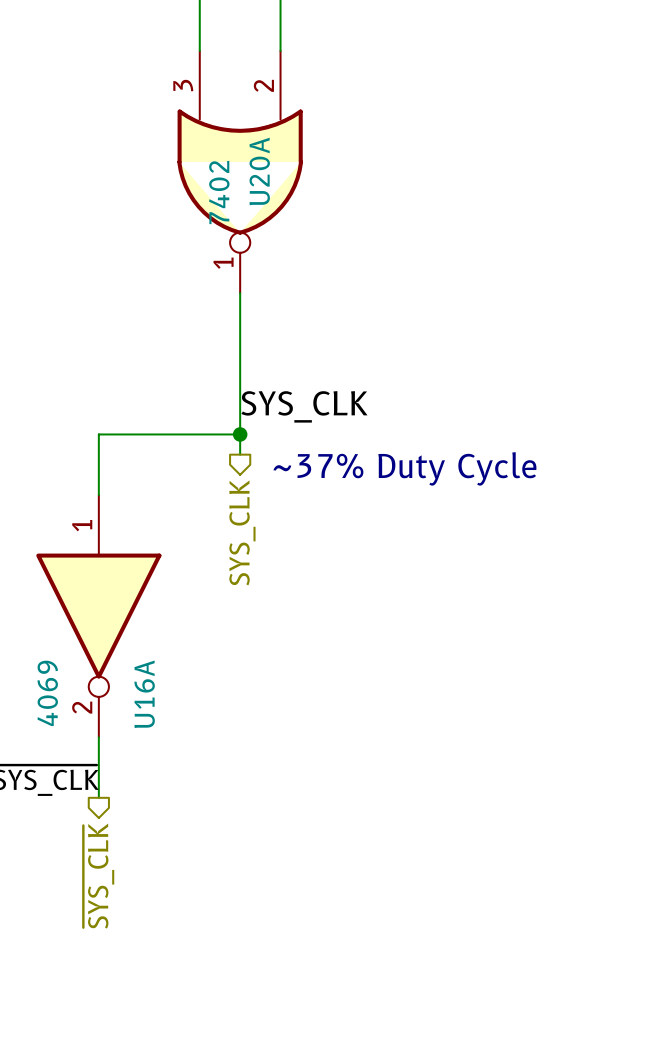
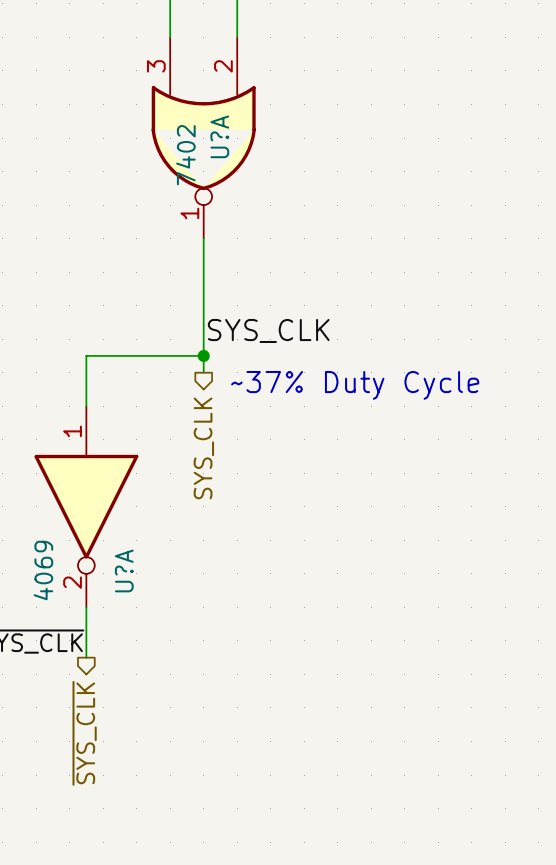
U20A name: U20A (259, 171) -> U?A (219, 136)
U16A name: U16A (144, 694) -> U?A (124, 570)

